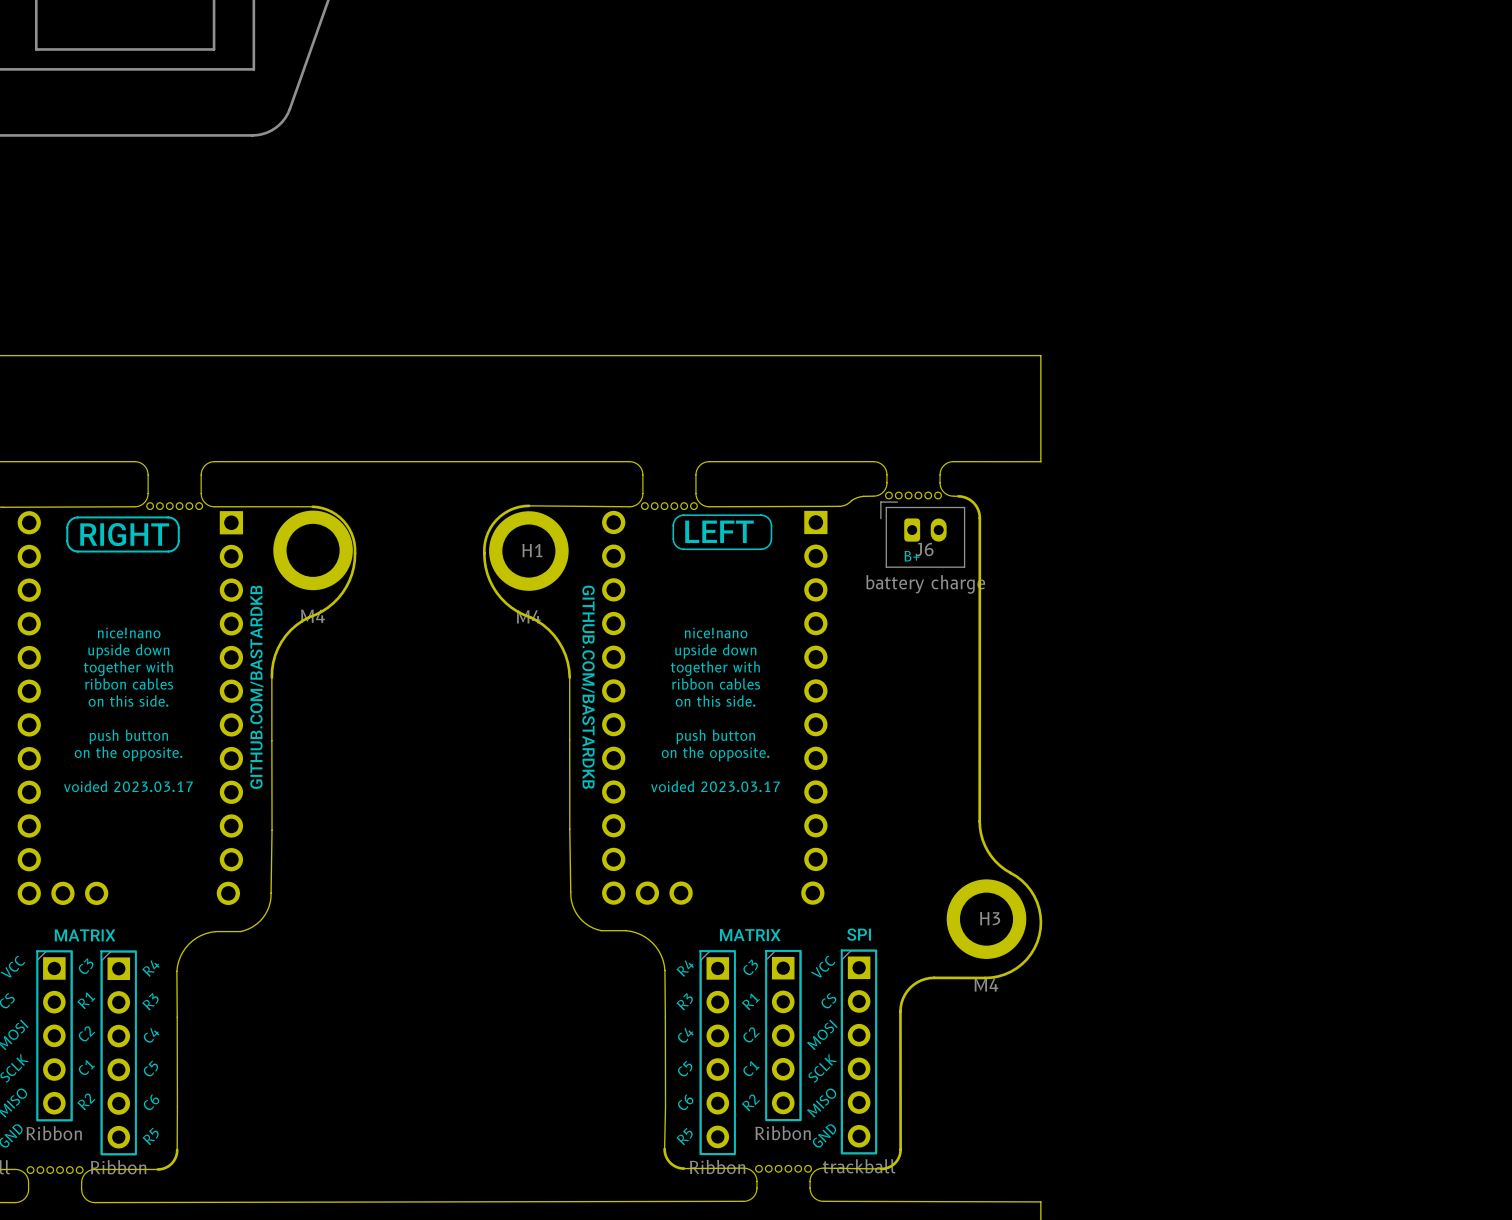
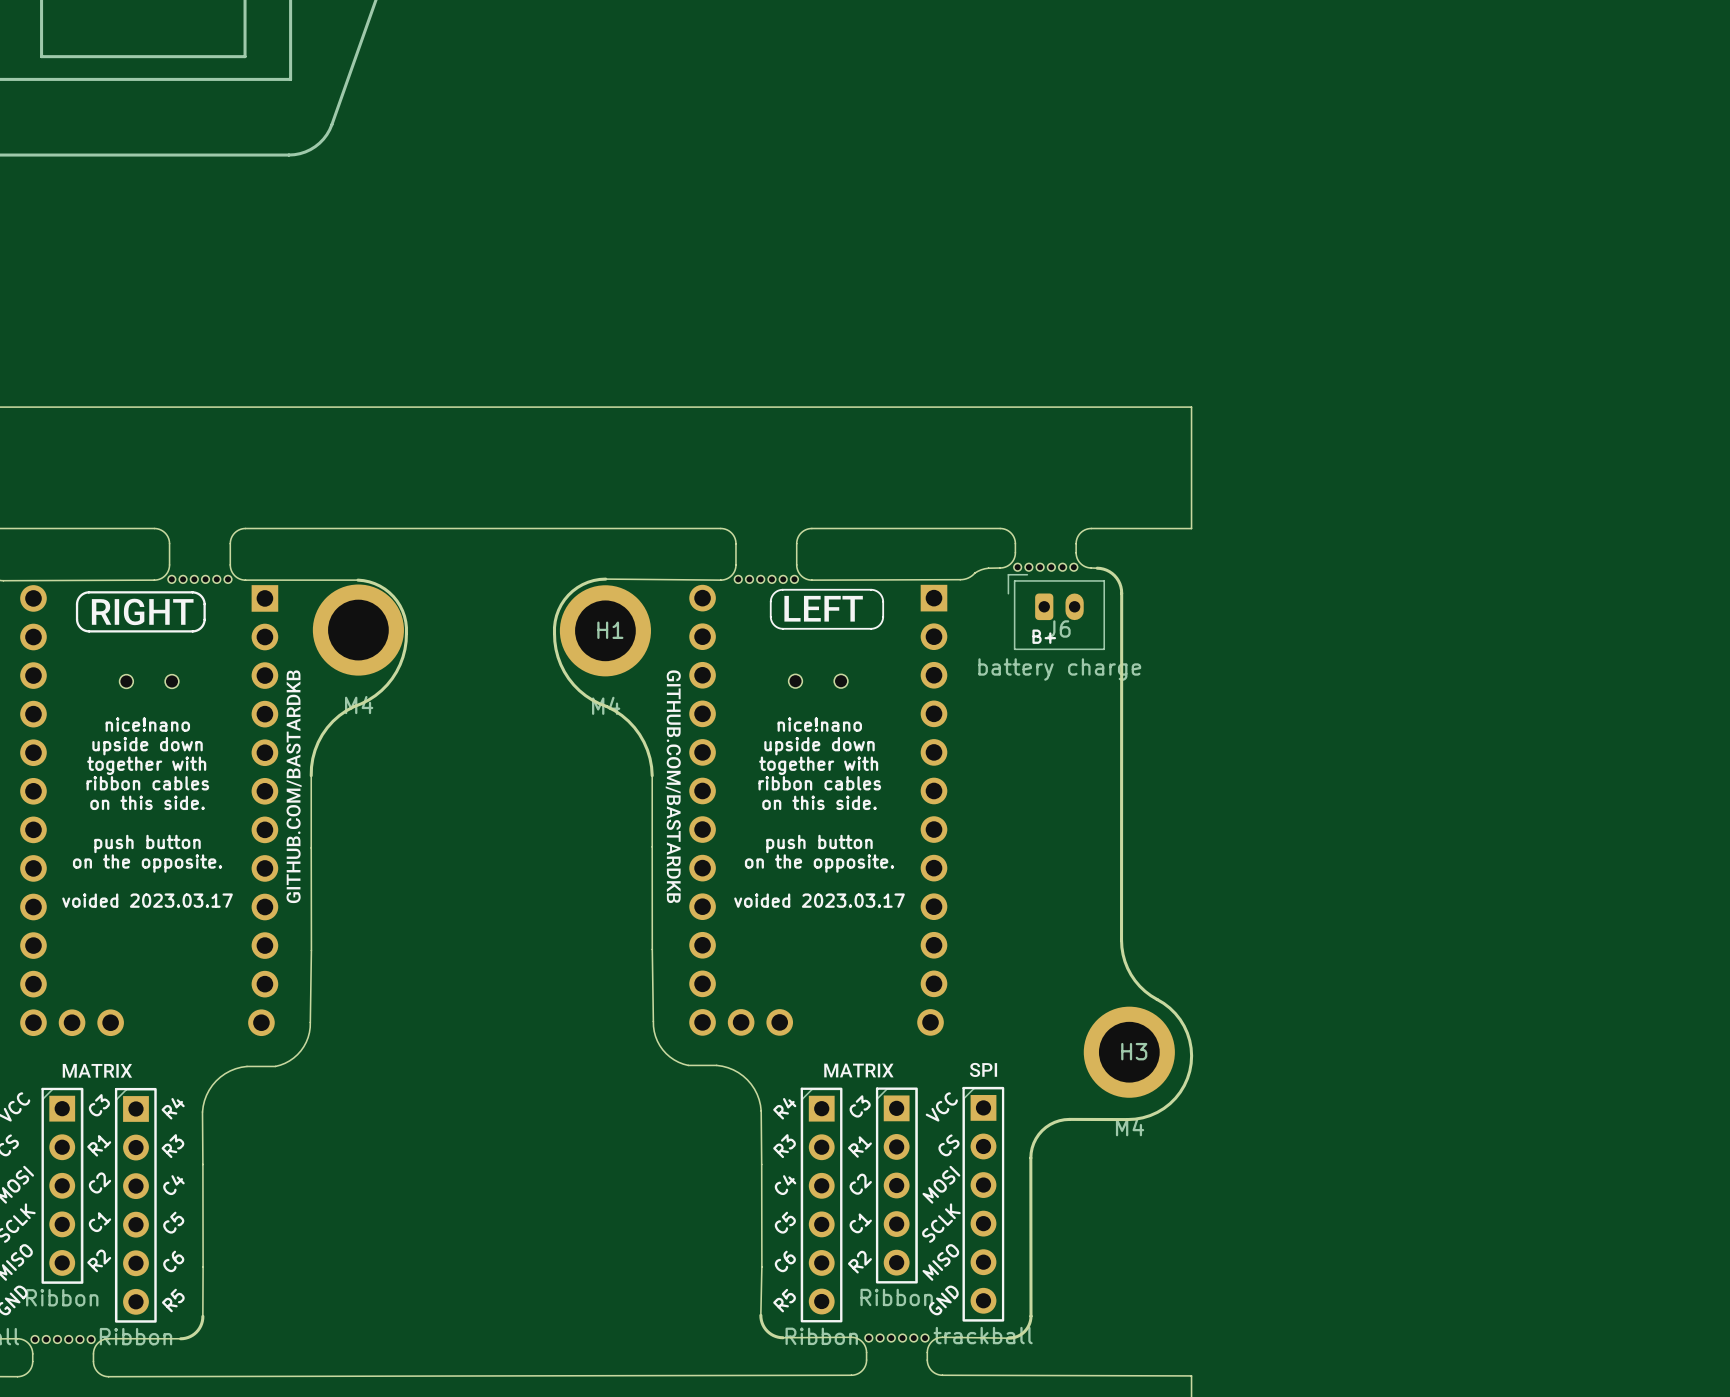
part: none -> (149, 681)
part: none -> (818, 681)

